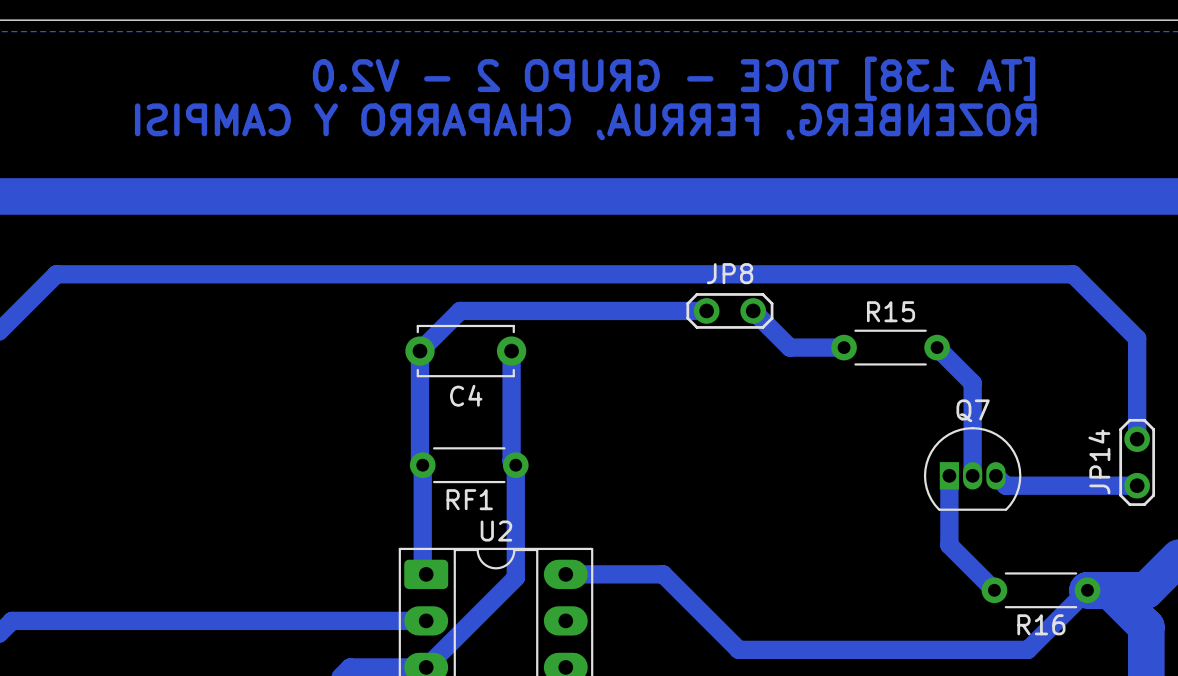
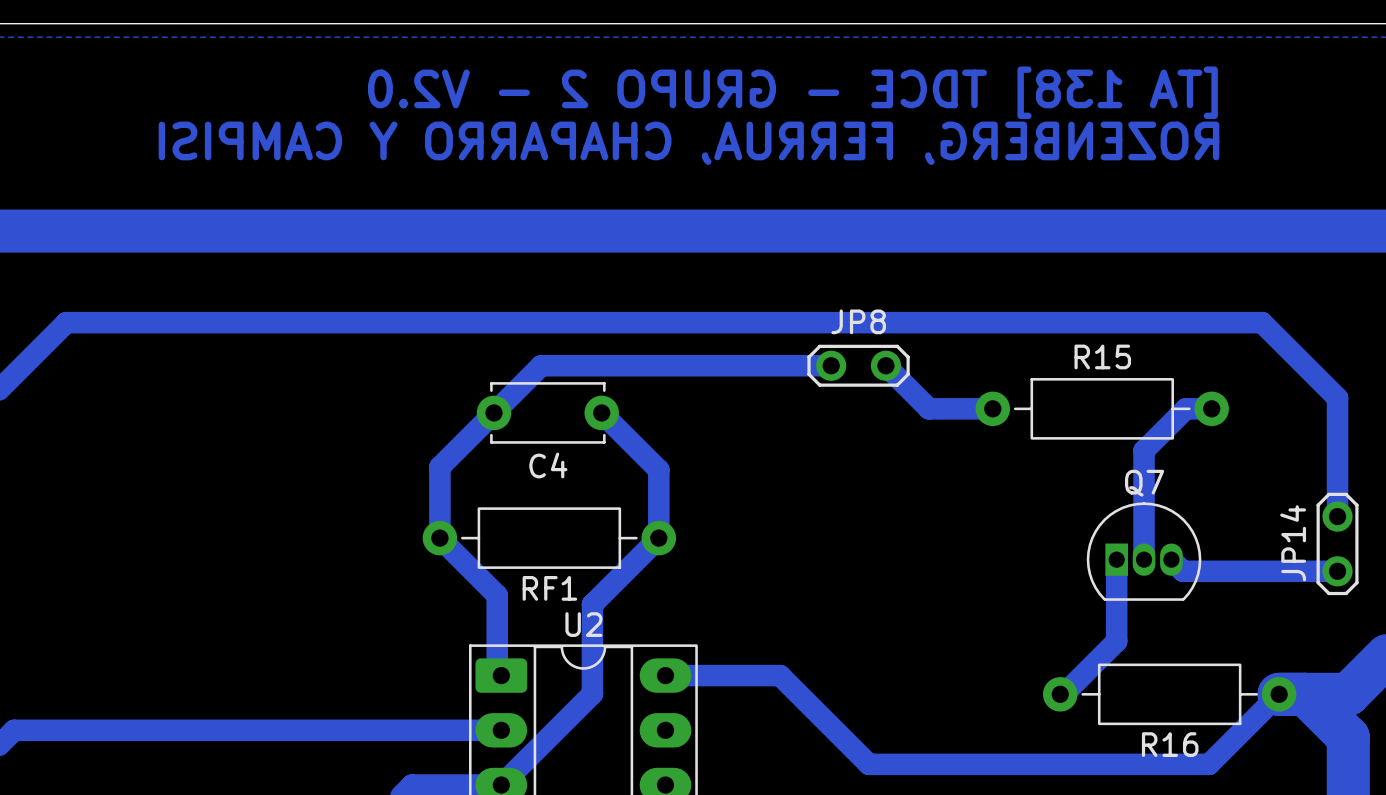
R15 footprint: [831, 329, 950, 366] -> [975, 378, 1229, 440]
bottom track: (937, 347) (972, 383) -> (1211, 408) (1185, 408) (1144, 450)
bottom track: (419, 351) (419, 462) (422, 465) (422, 506) -> (493, 412) (439, 467) (439, 538) (497, 595)
bottom track: (511, 351) (511, 460) (515, 465) (515, 577) (503, 589) -> (601, 412) (658, 470) (658, 538) (592, 604) (592, 693)
RF1 footprint: [409, 447, 529, 484] -> [422, 507, 677, 569]
bottom track: (949, 545) (994, 590) -> (1116, 641) (1063, 694) (1060, 694)
R16 footprint: [981, 572, 1101, 609] -> [1043, 663, 1297, 726]

